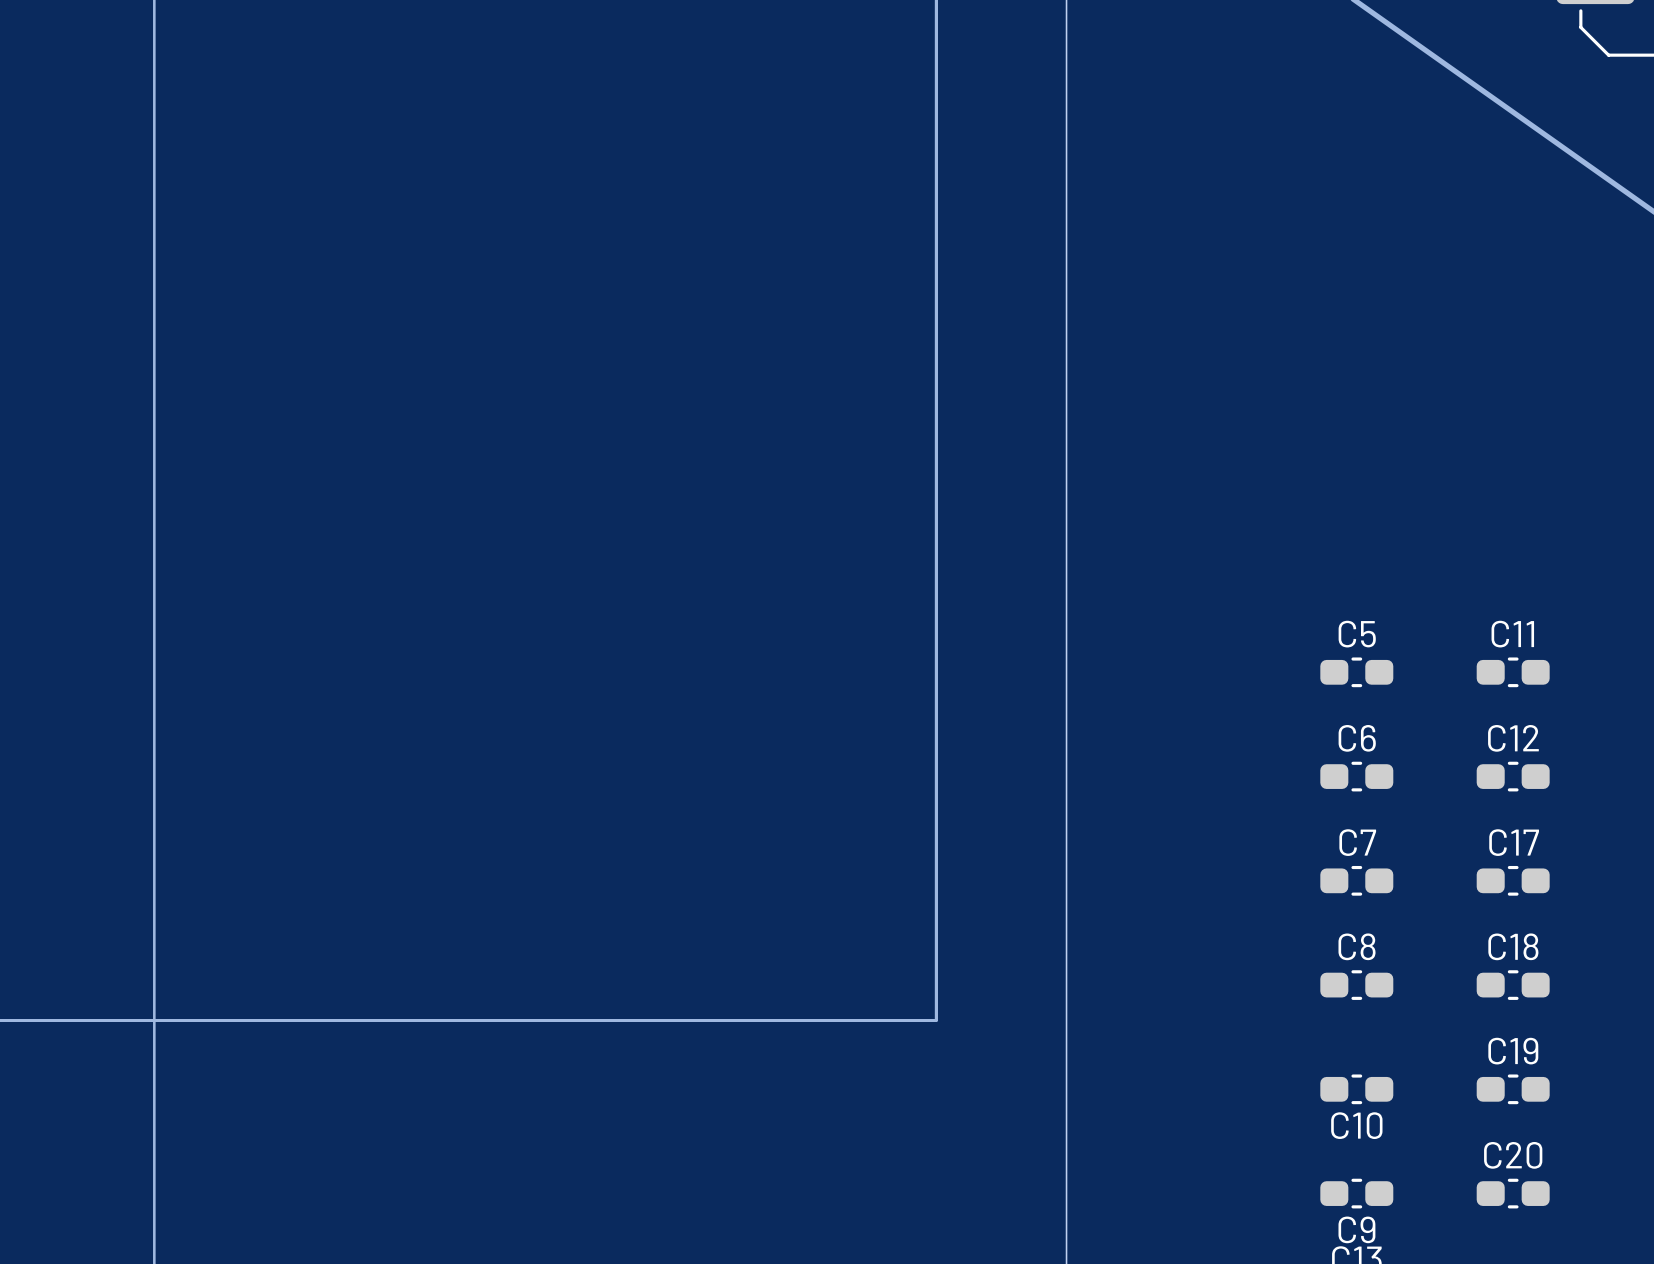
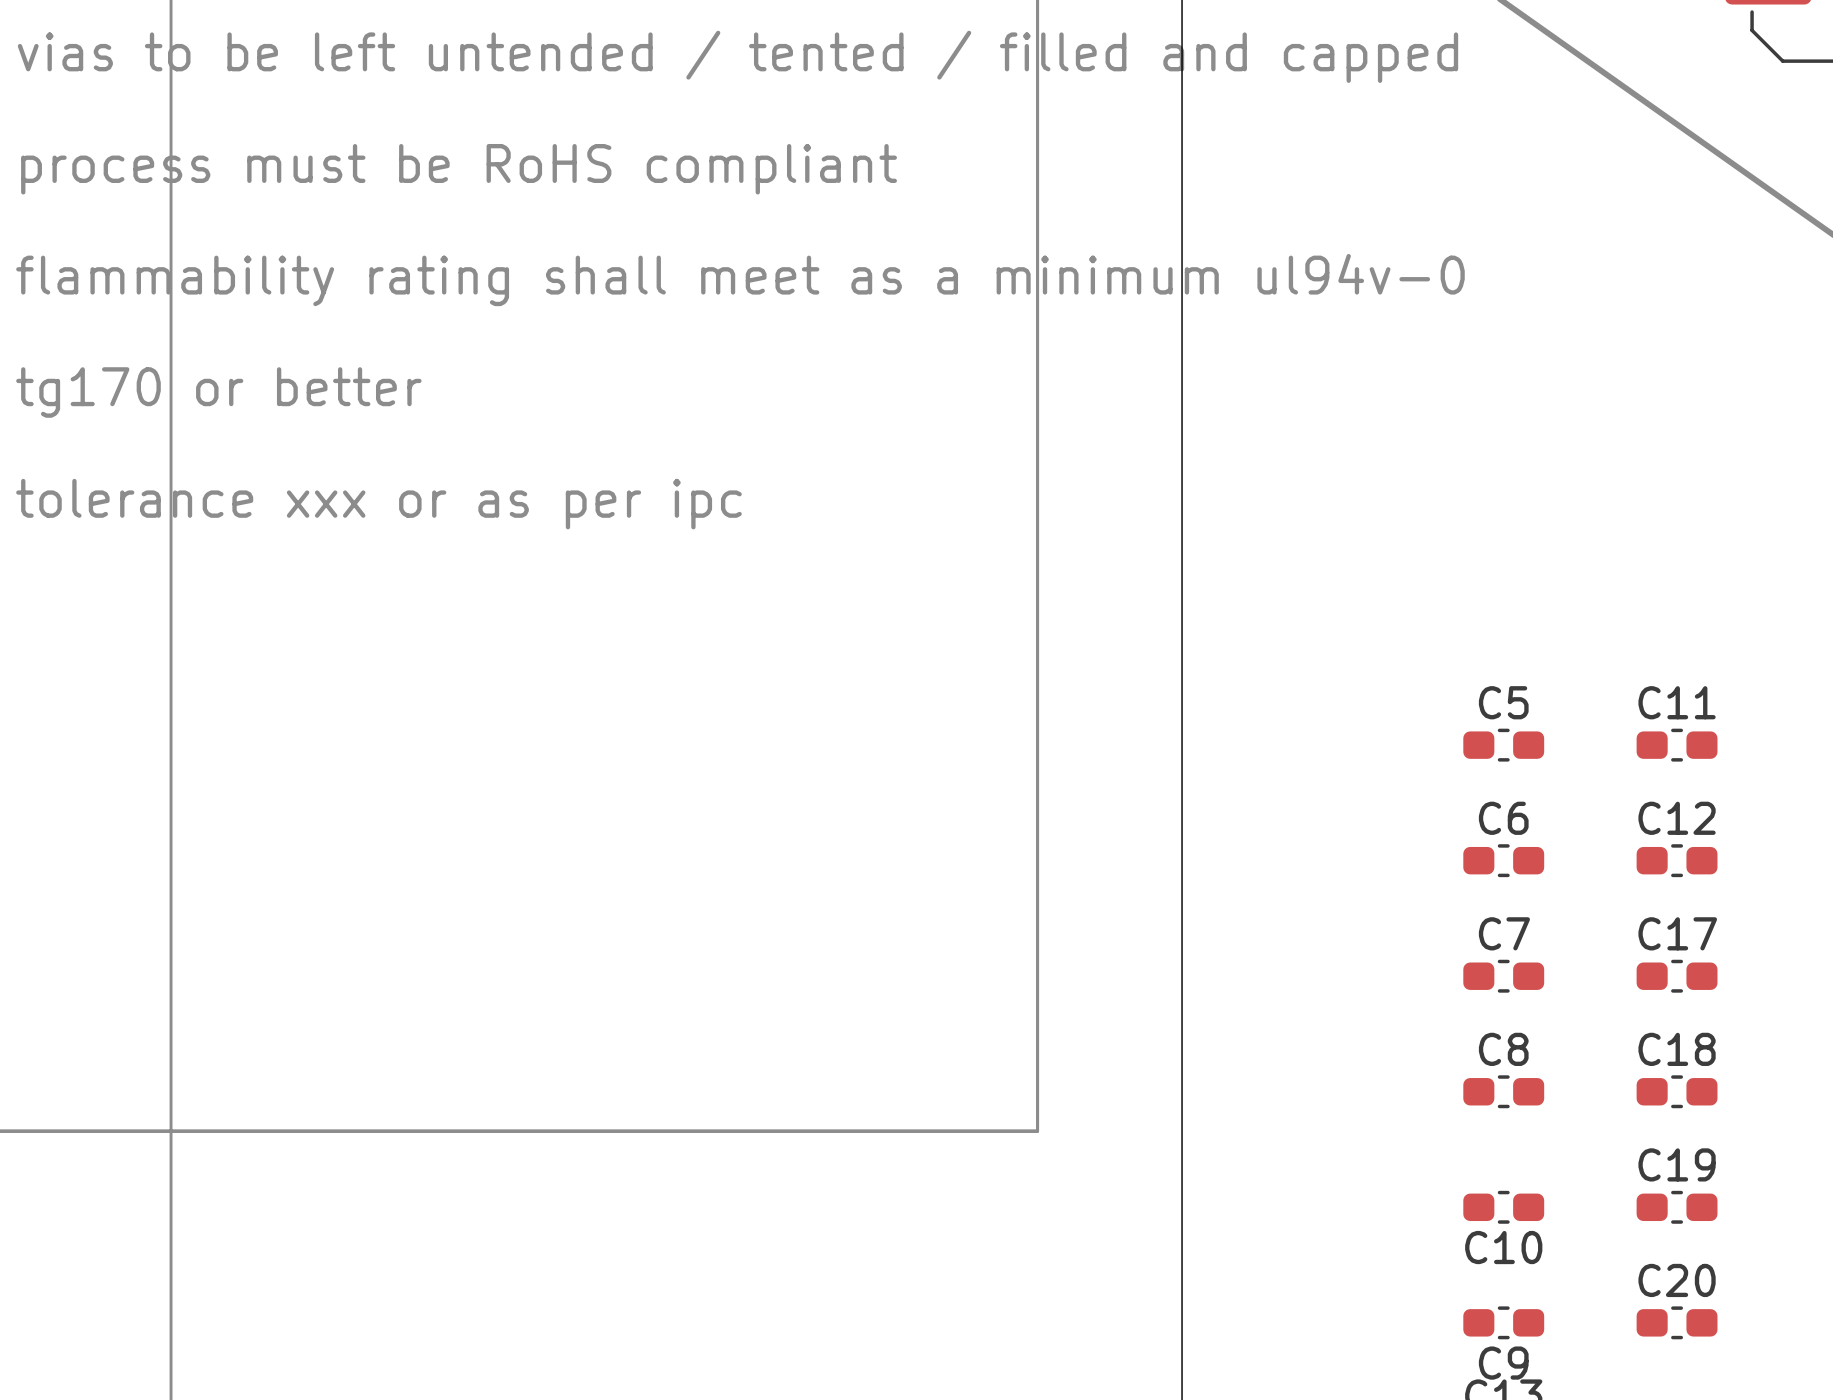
text: none -> vias to be left untended / tented / filled and capped (737, 56)
text: none -> process must be RoHS compliant (459, 169)
text: none -> flammability rating shall meet as a minimum ul94v-0 (740, 280)
text: none -> tg170 or better (218, 392)
text: none -> tolerance xxx or as per ipc (378, 504)

